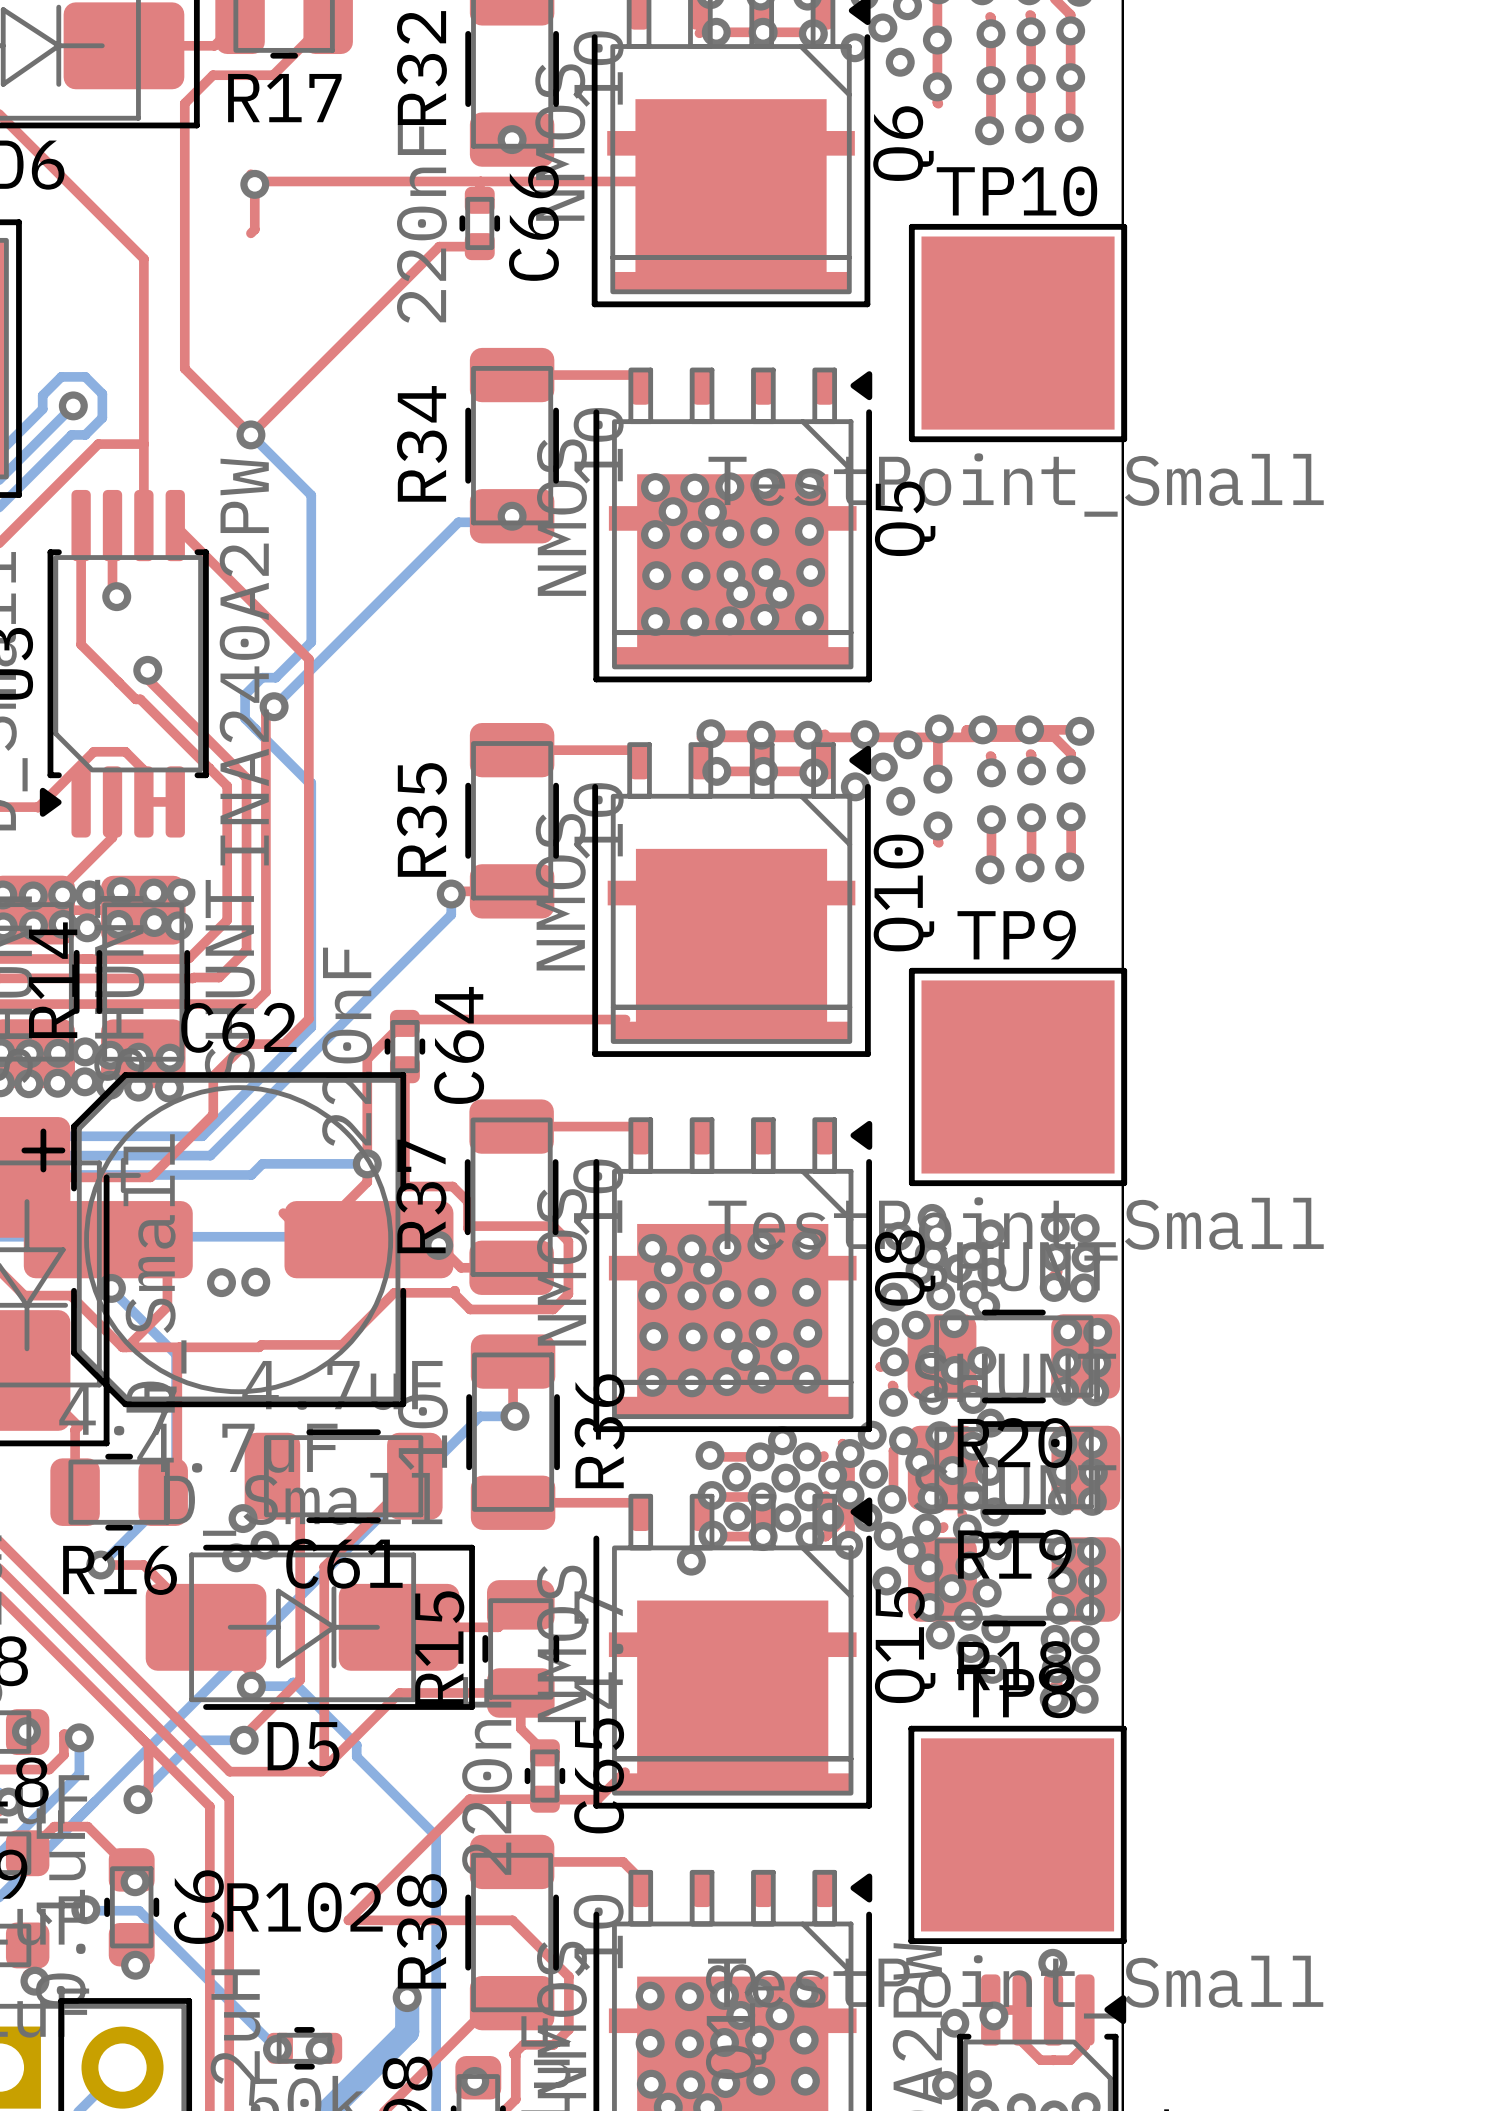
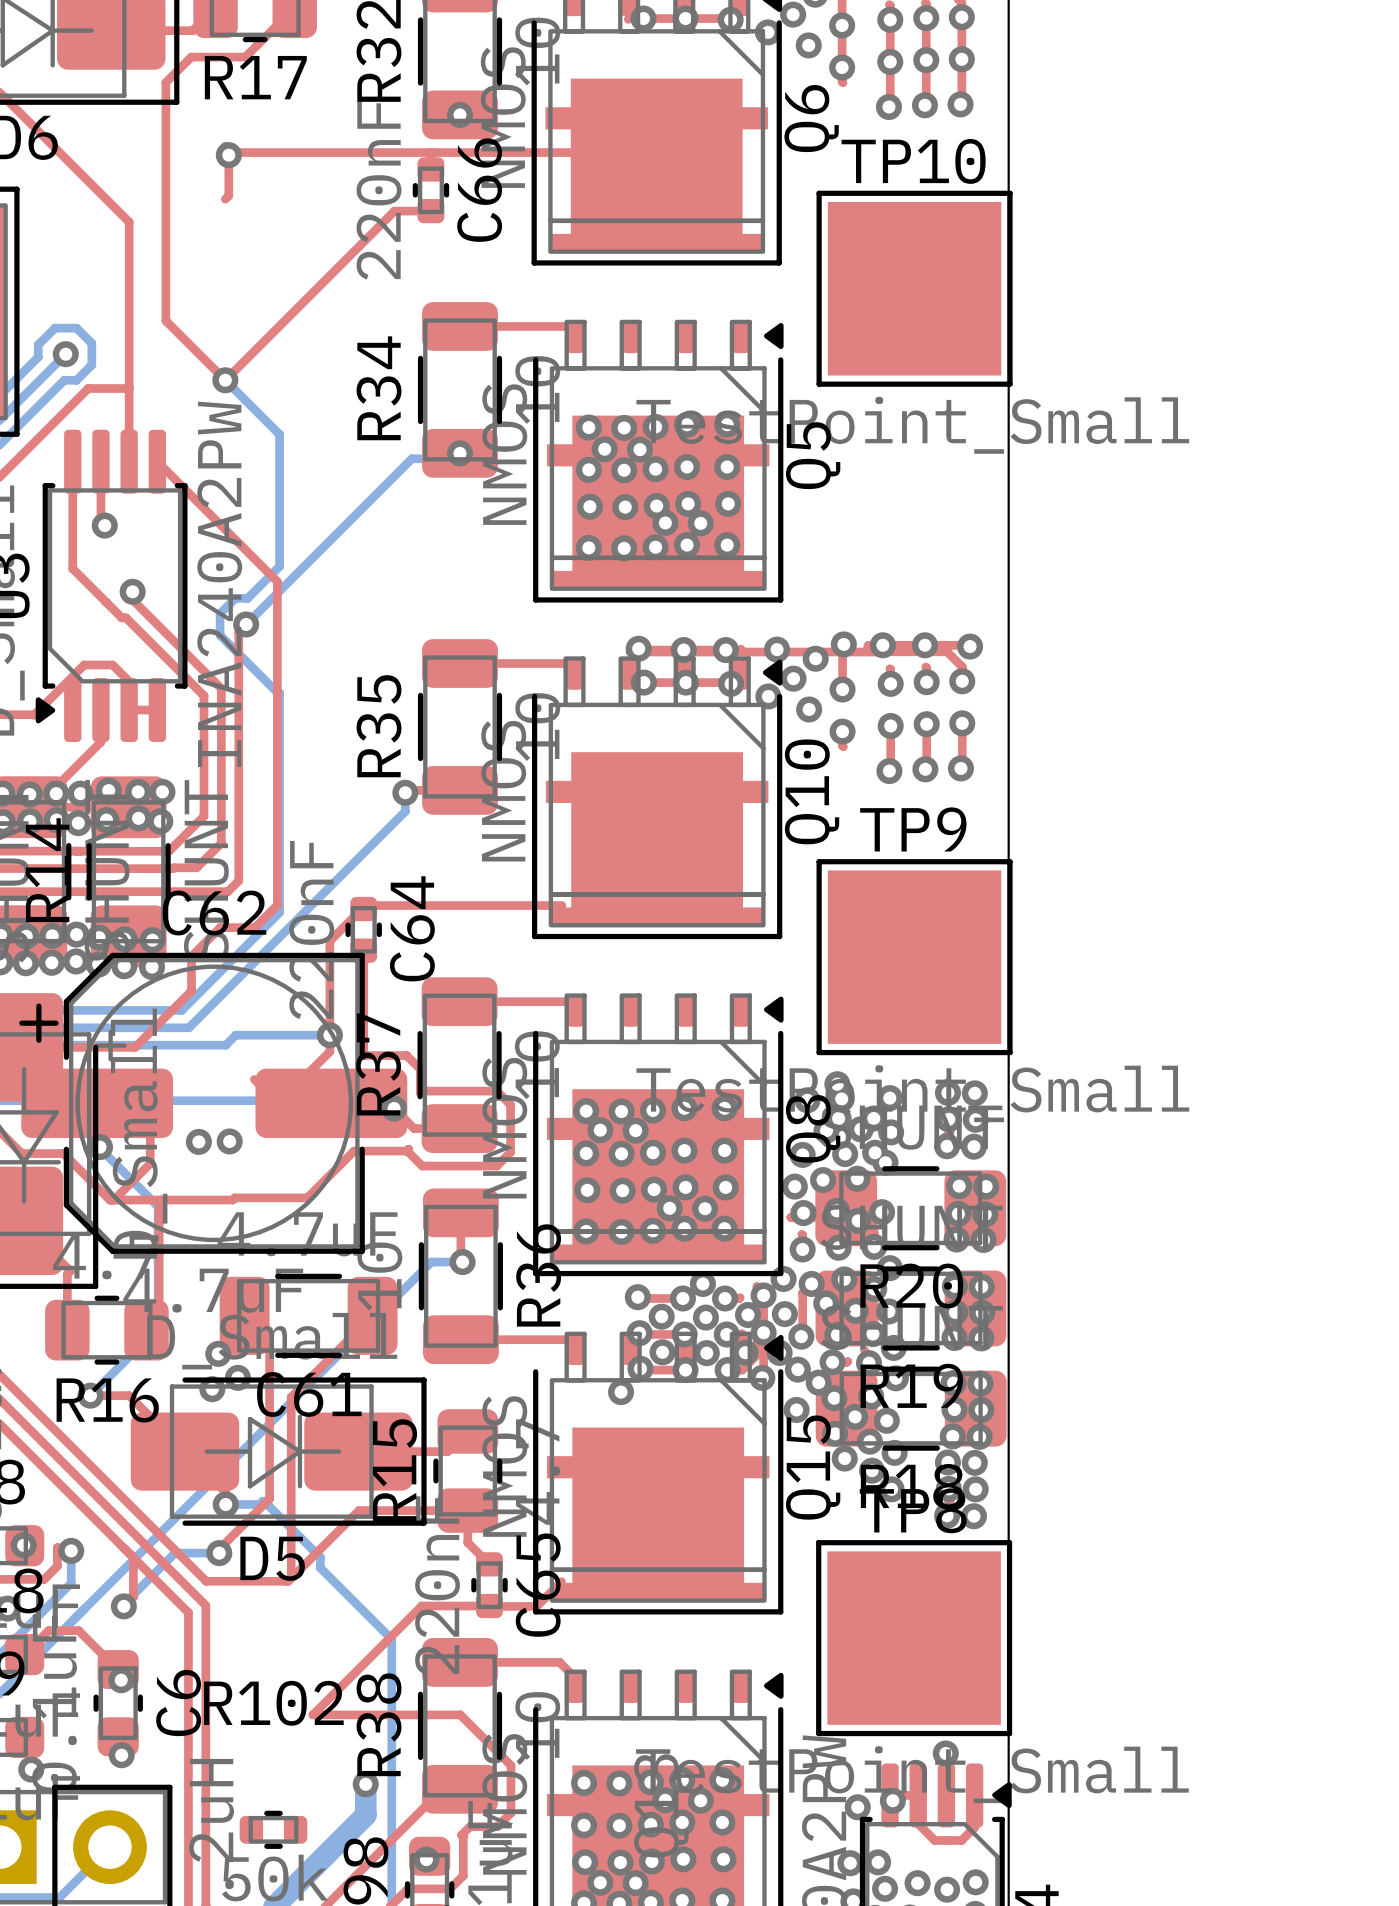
bottom track: (85, 1909) (138, 1910) (277, 2049) -> none
via: (85, 1909) -> none
via: (277, 2049) -> none
via: (320, 2050) -> none

